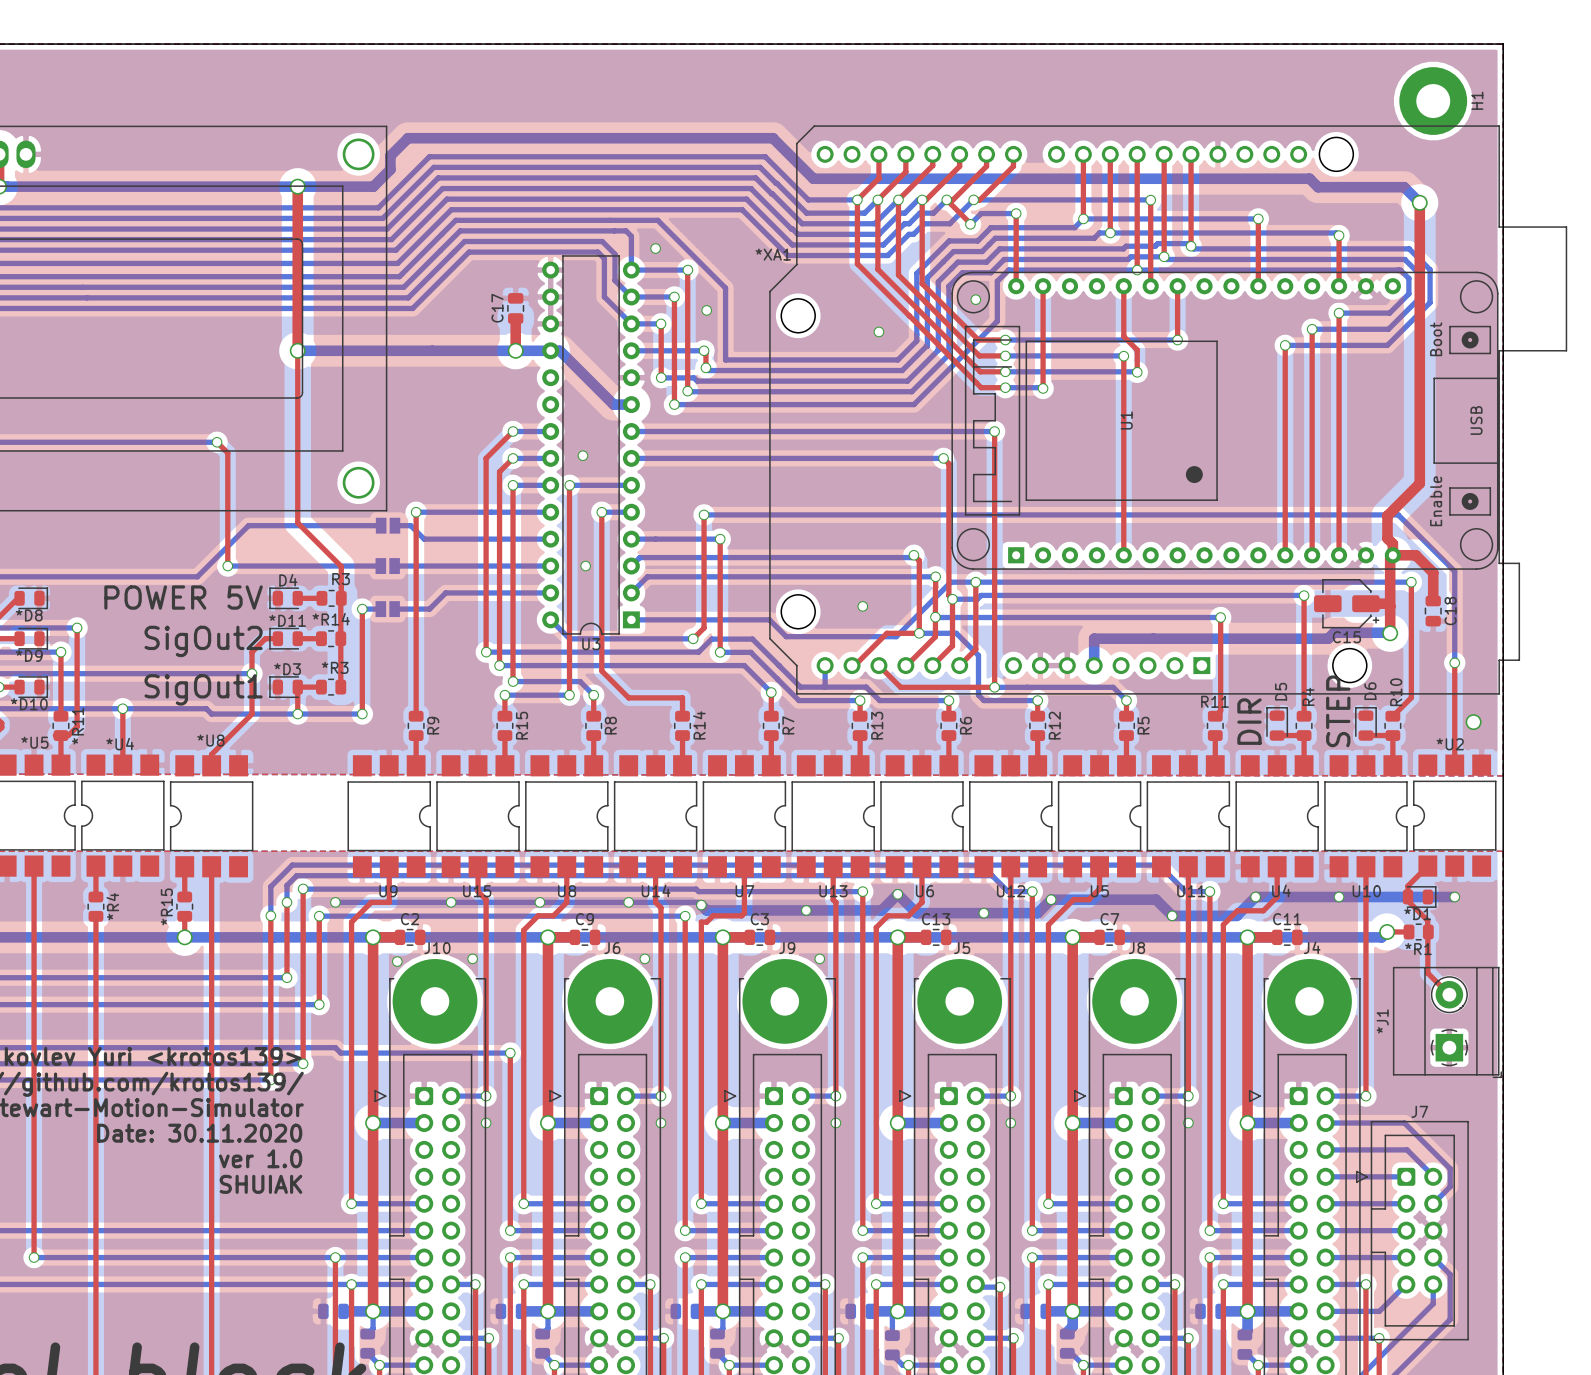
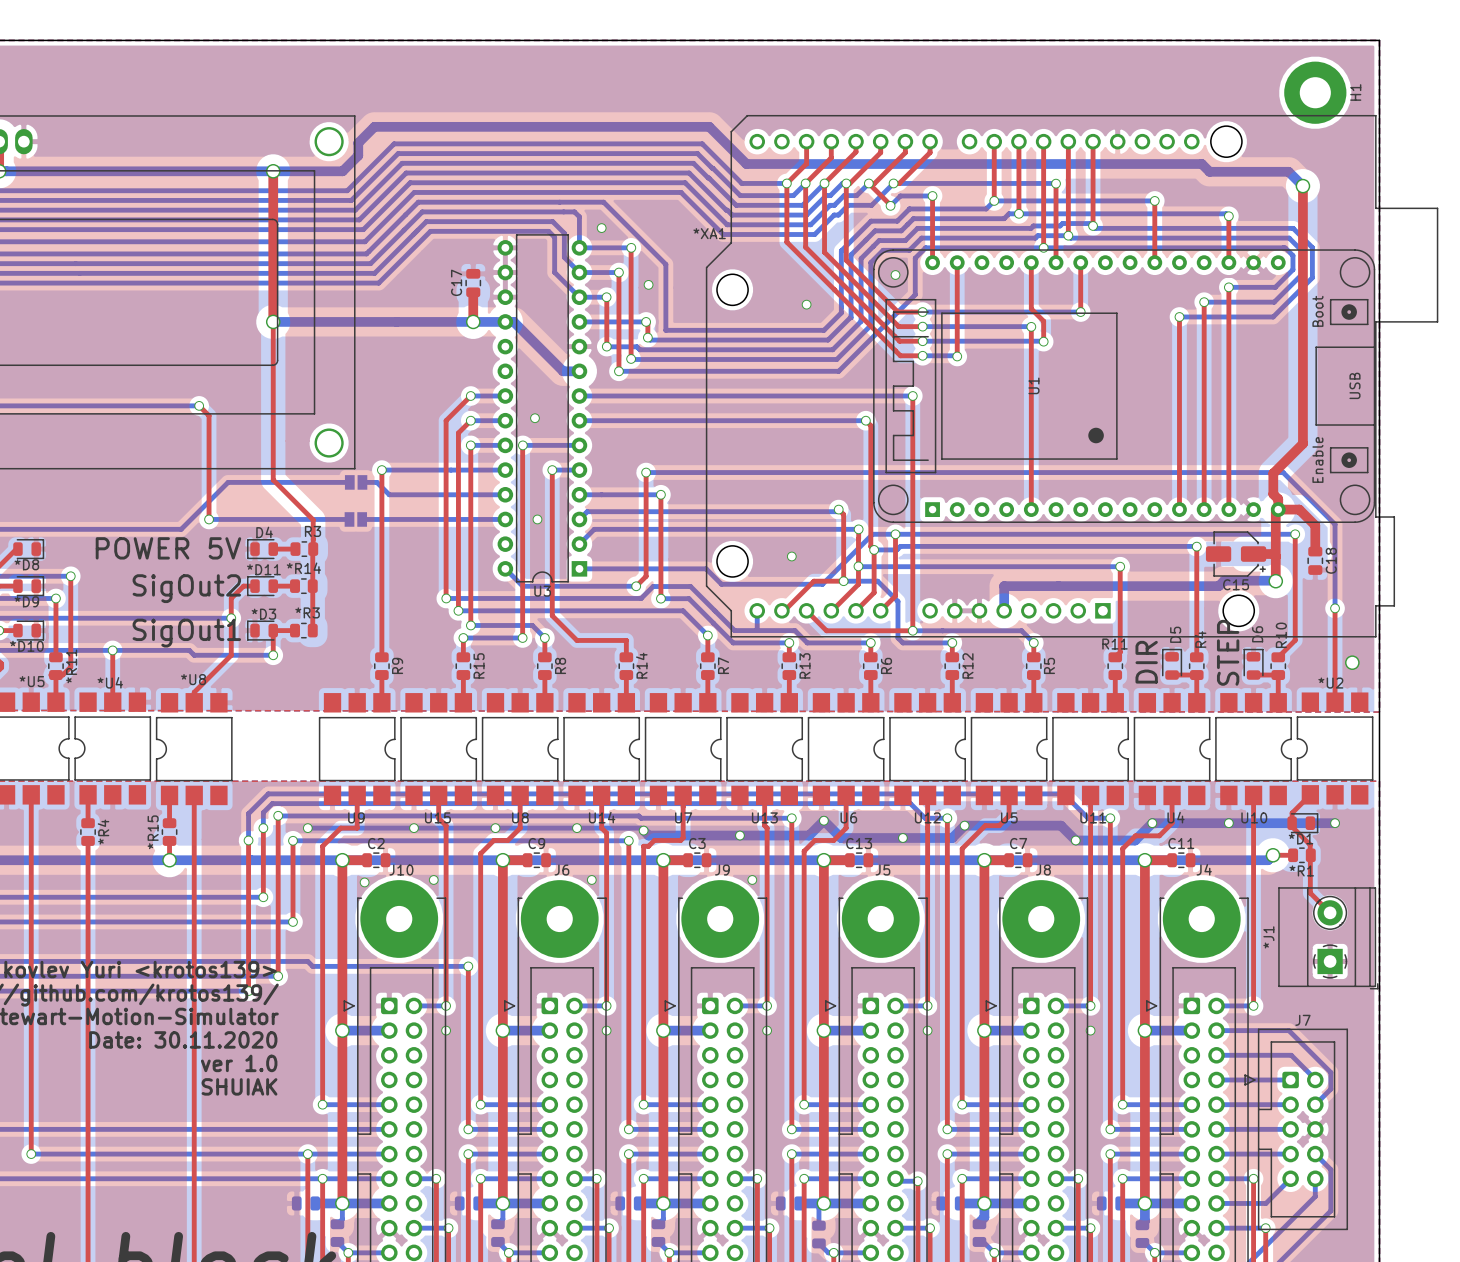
bottom track: (550, 592) (445, 592) (429, 609) (394, 609) -> none
top track: (362, 609) (362, 714) -> none
bottom track: (362, 609) (380, 609) -> none
via: (362, 609) -> none
part: (387, 609) -> none
bottom track: (297, 714) (362, 714) -> none
via: (362, 714) -> none

